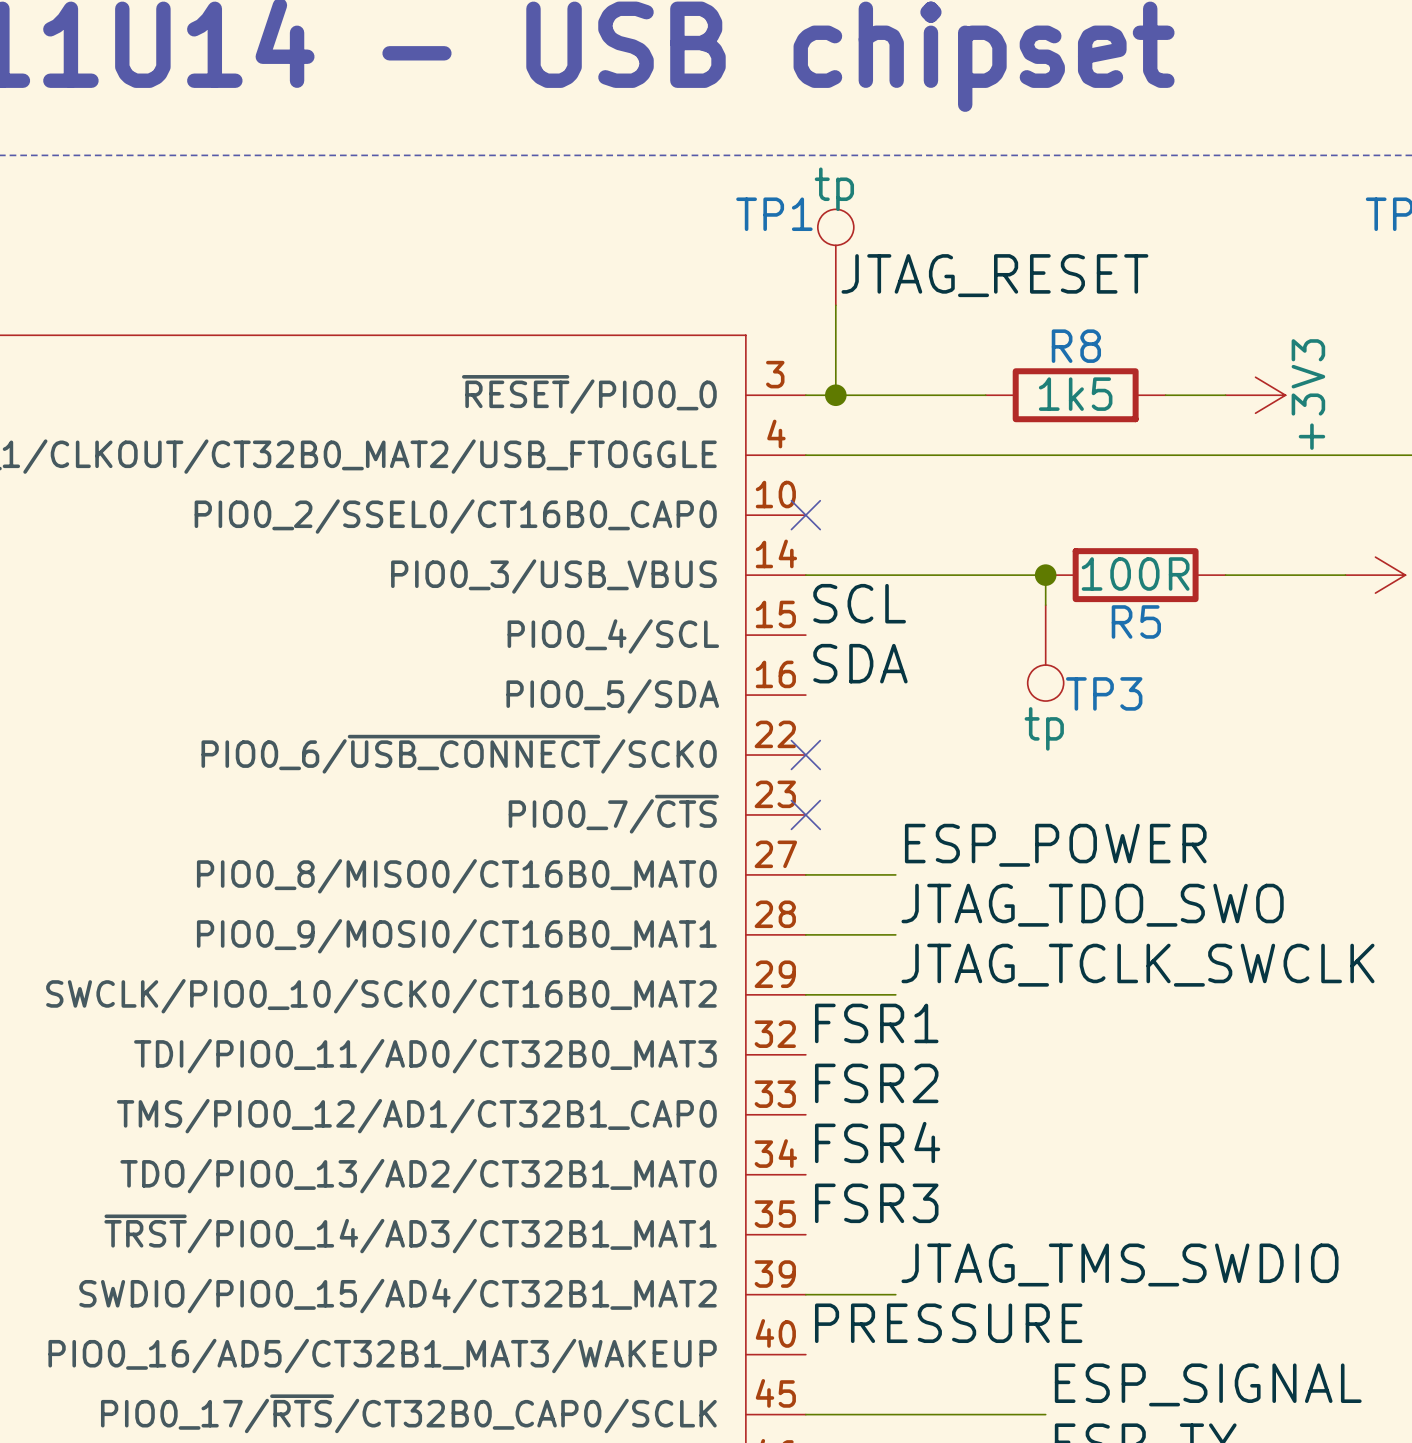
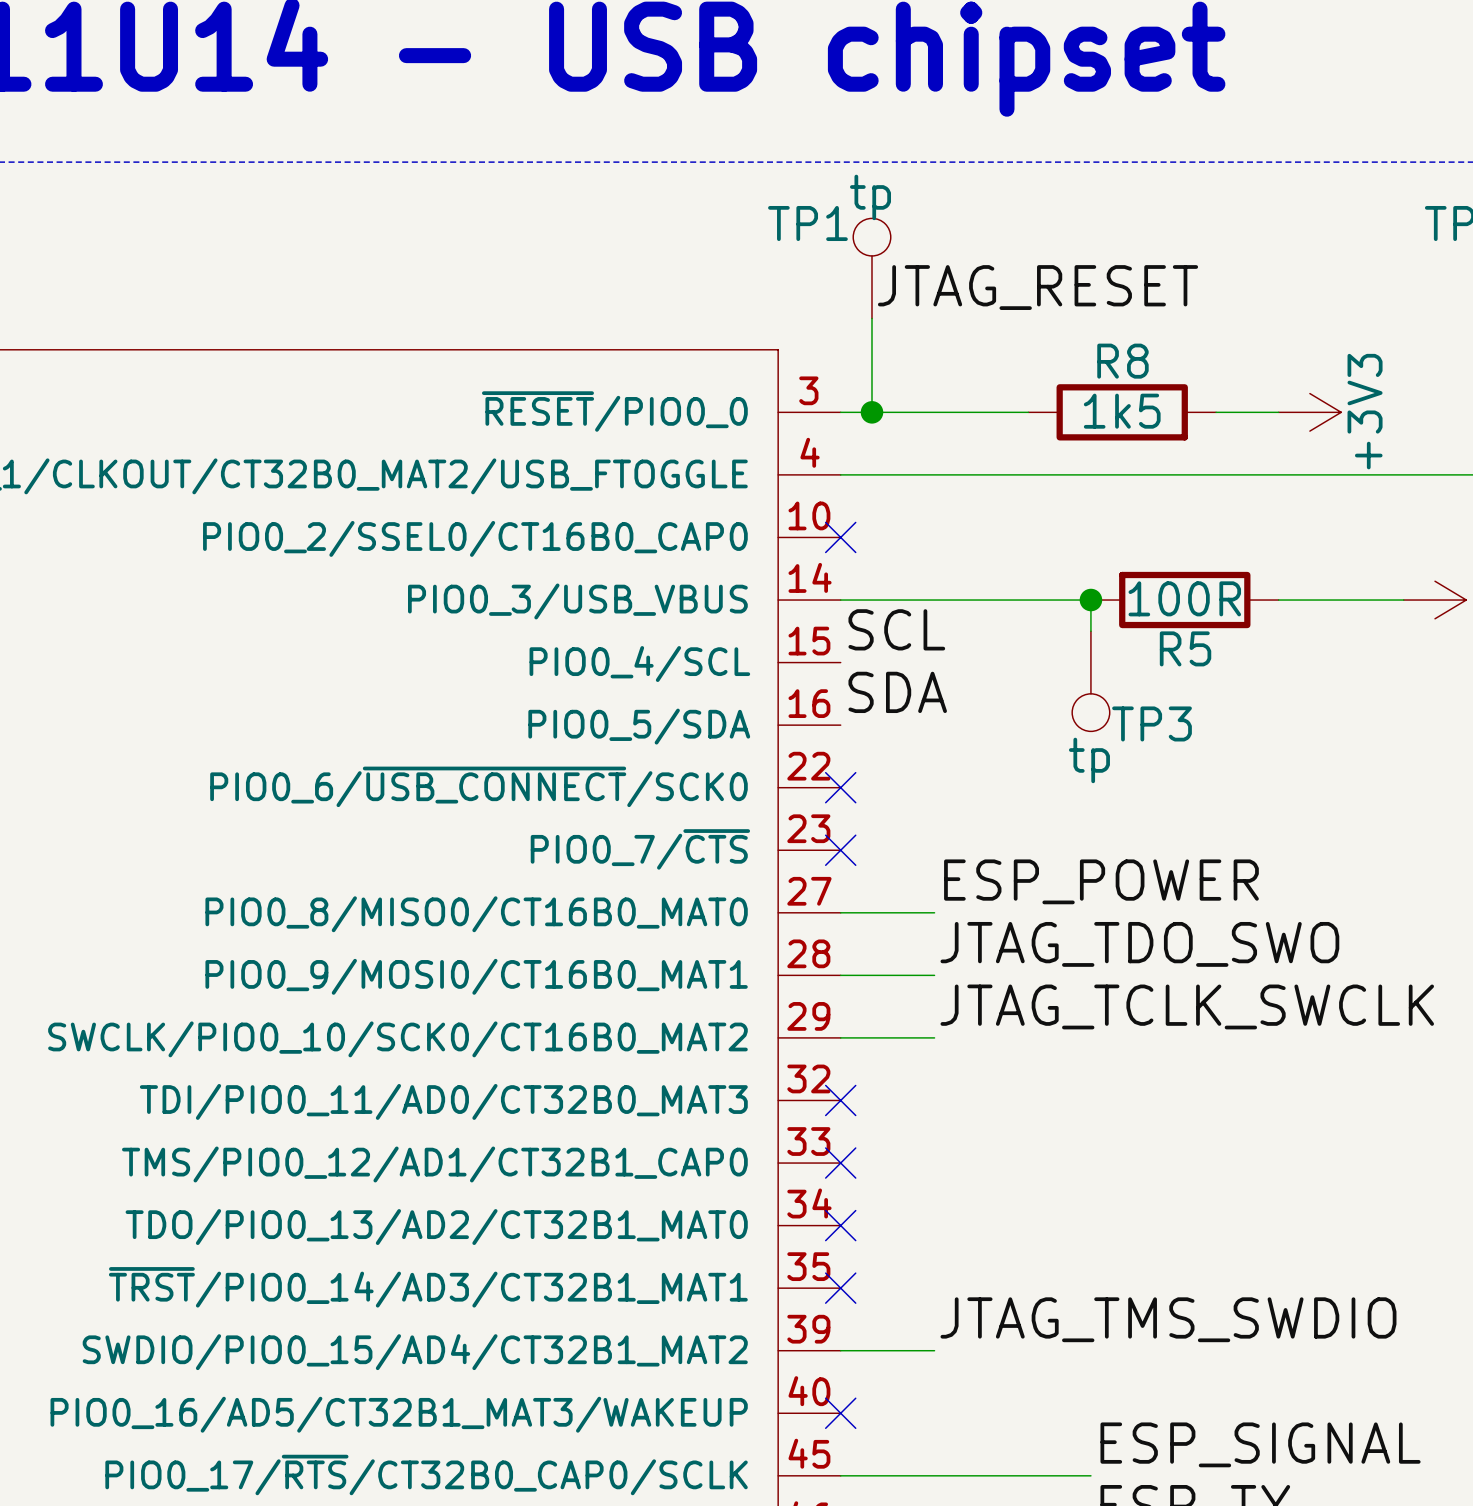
label: FSR1 (876, 1023) -> none
no-connect mark: none -> (840, 1100)
label: FSR2 (876, 1083) -> none
no-connect mark: none -> (840, 1163)
label: FSR4 (877, 1142) -> none
no-connect mark: none -> (840, 1225)
label: FSR3 (876, 1203) -> none
no-connect mark: none -> (840, 1288)
label: PRESSURE (948, 1323) -> none
no-connect mark: none -> (840, 1413)

